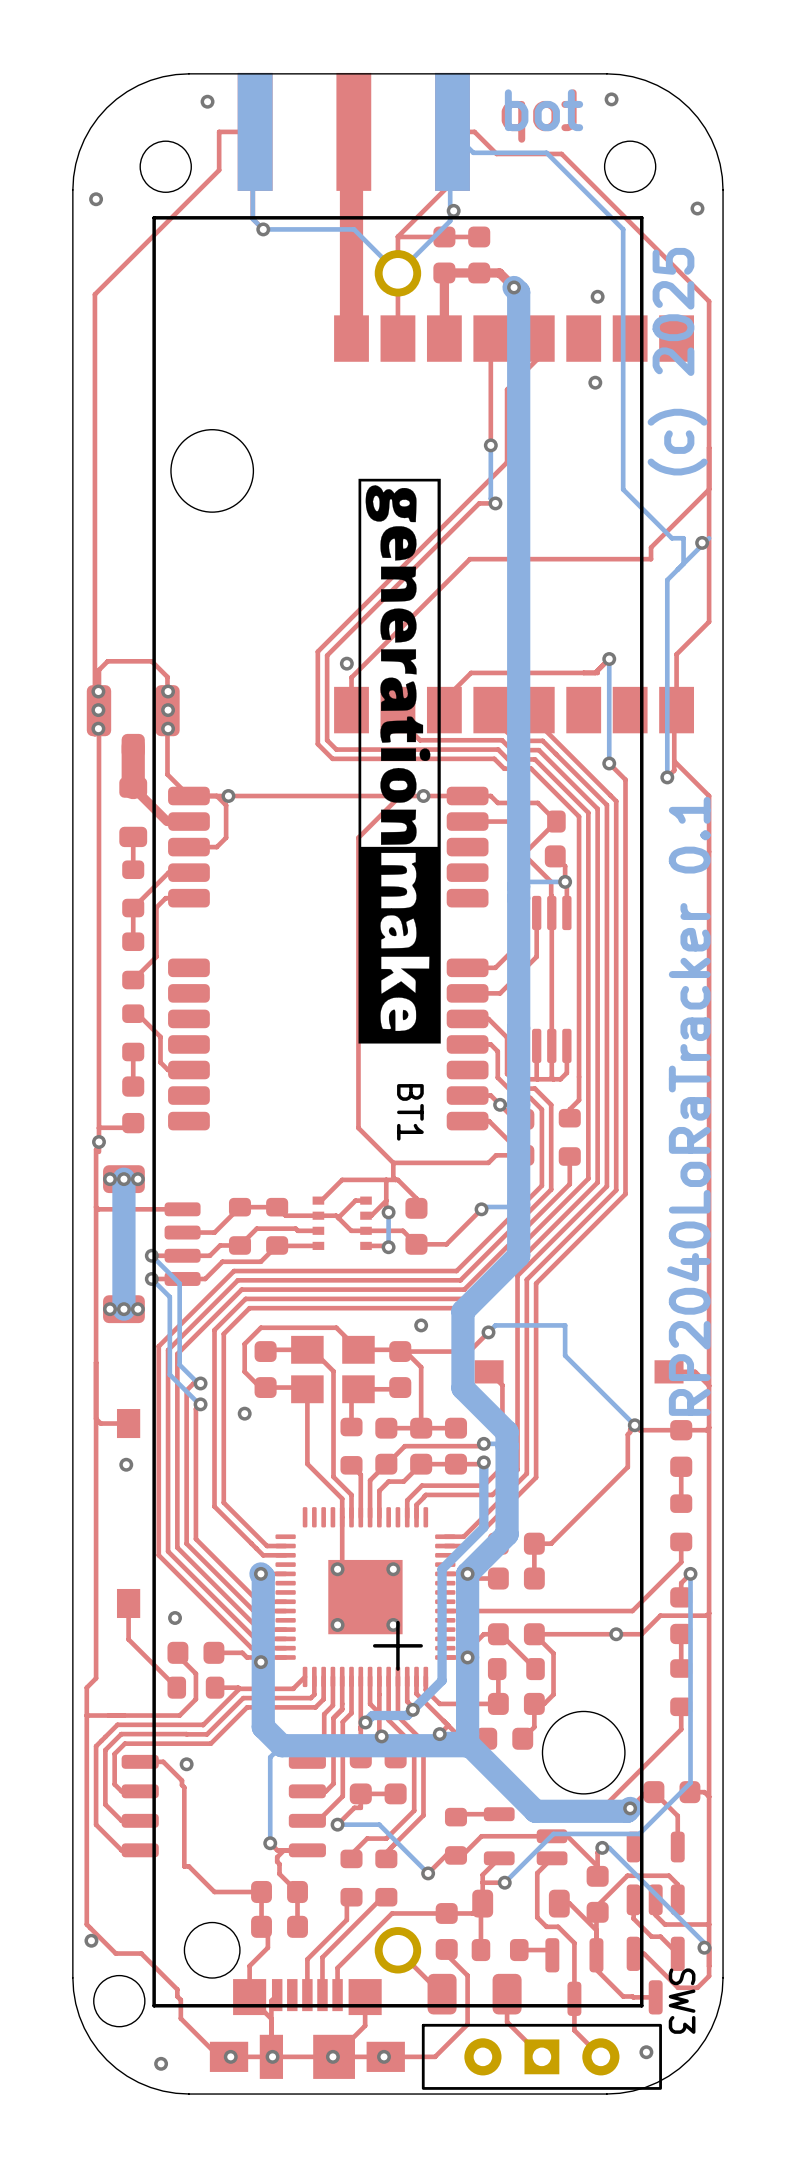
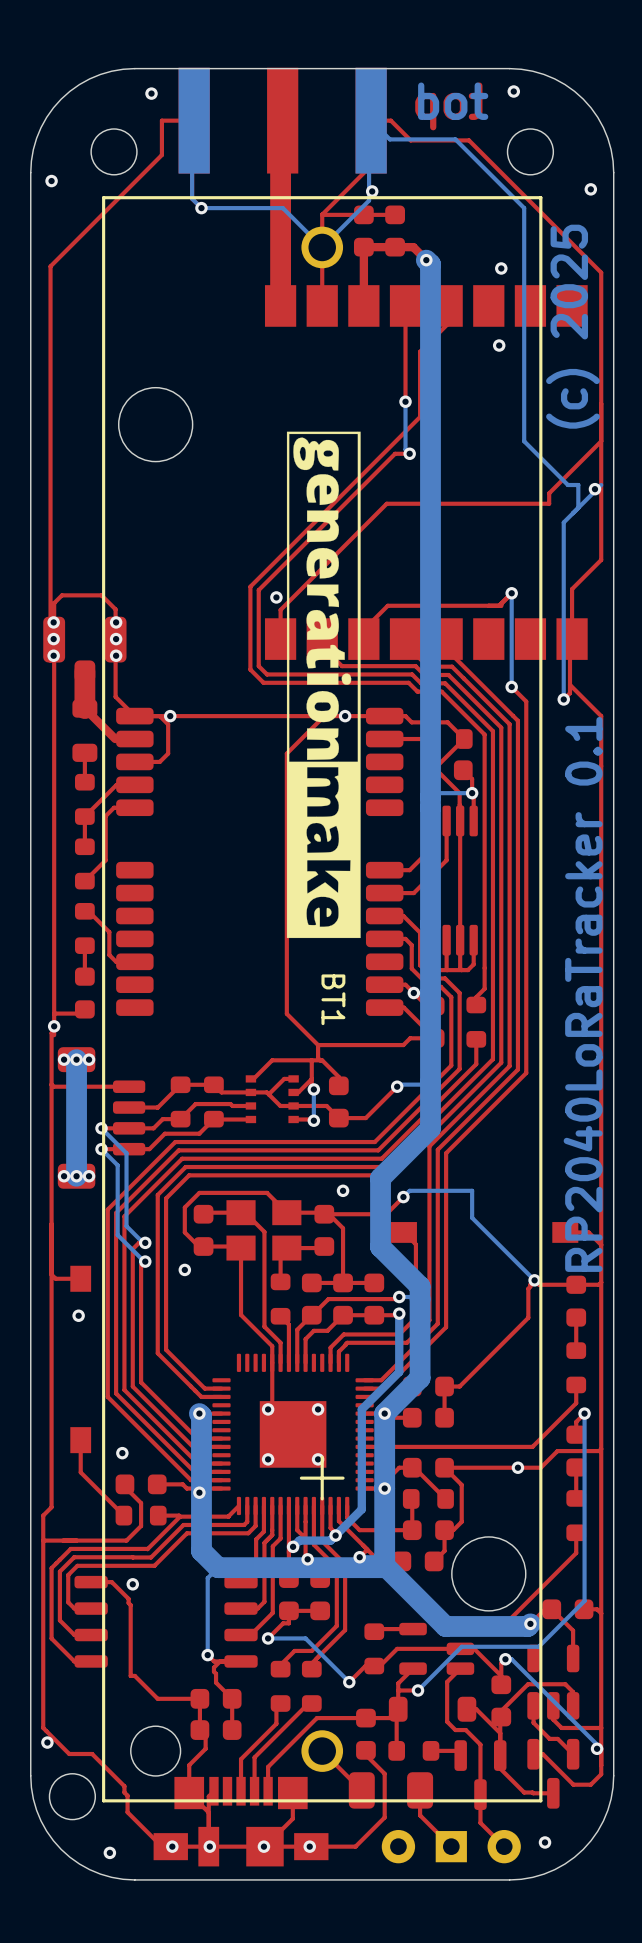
SW3 side: bottom (541, 2056) -> top (451, 1846)

